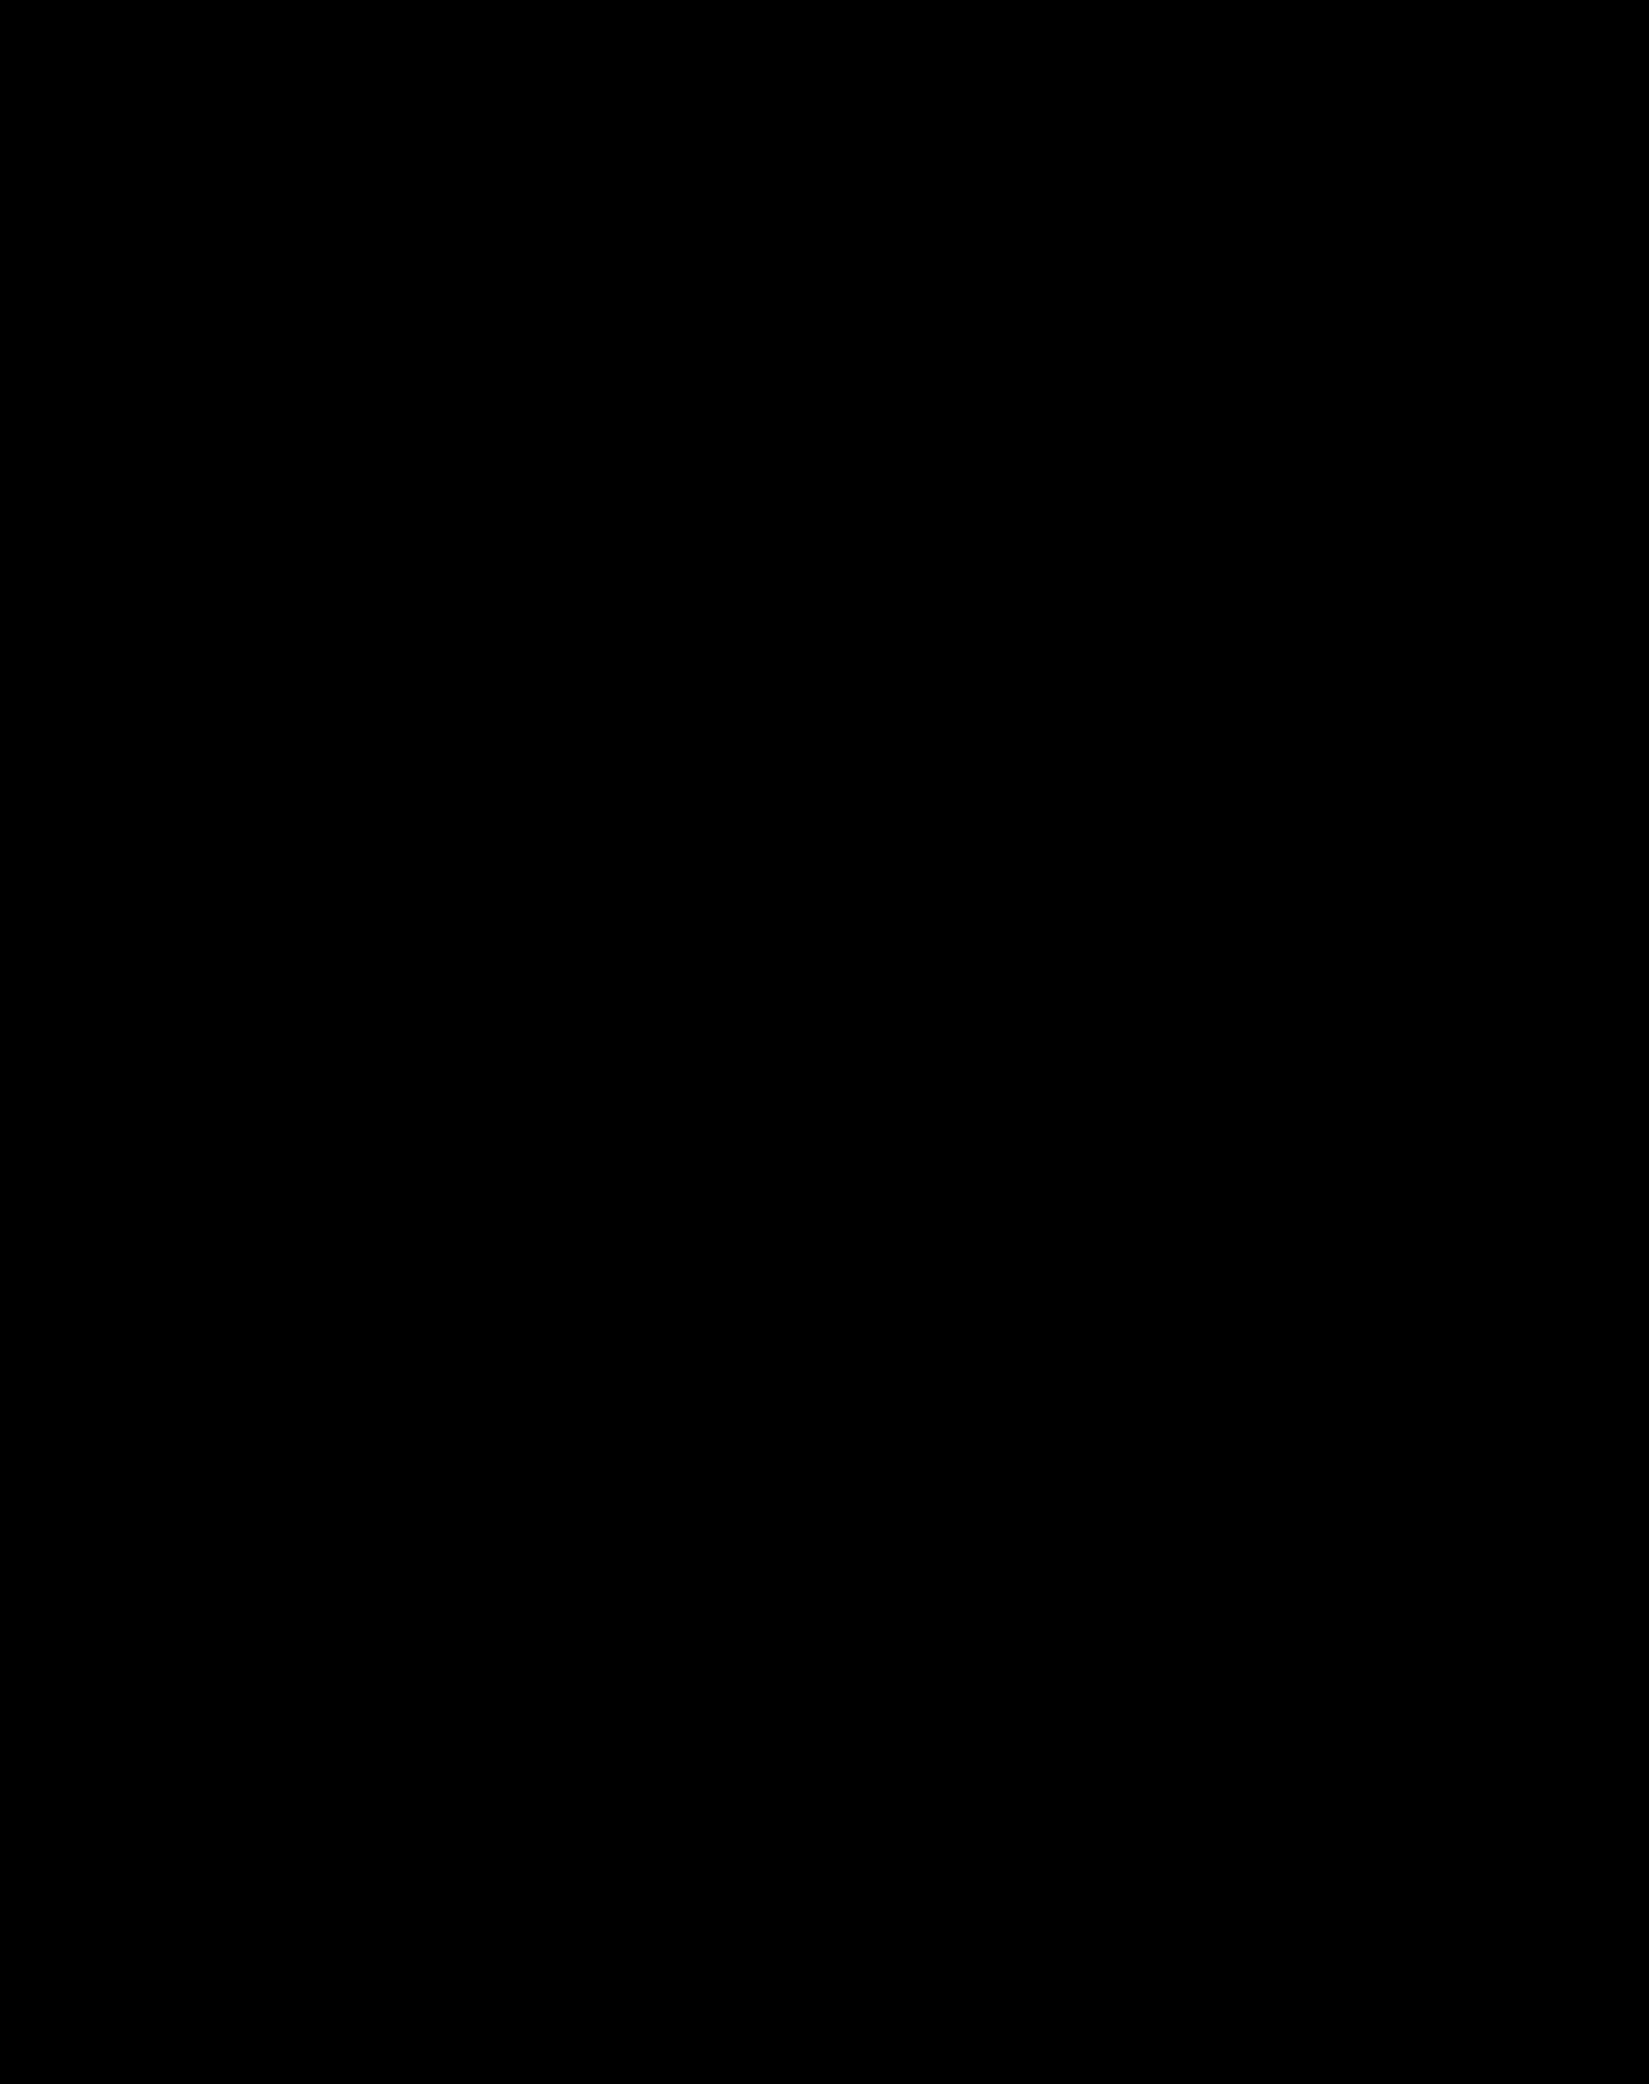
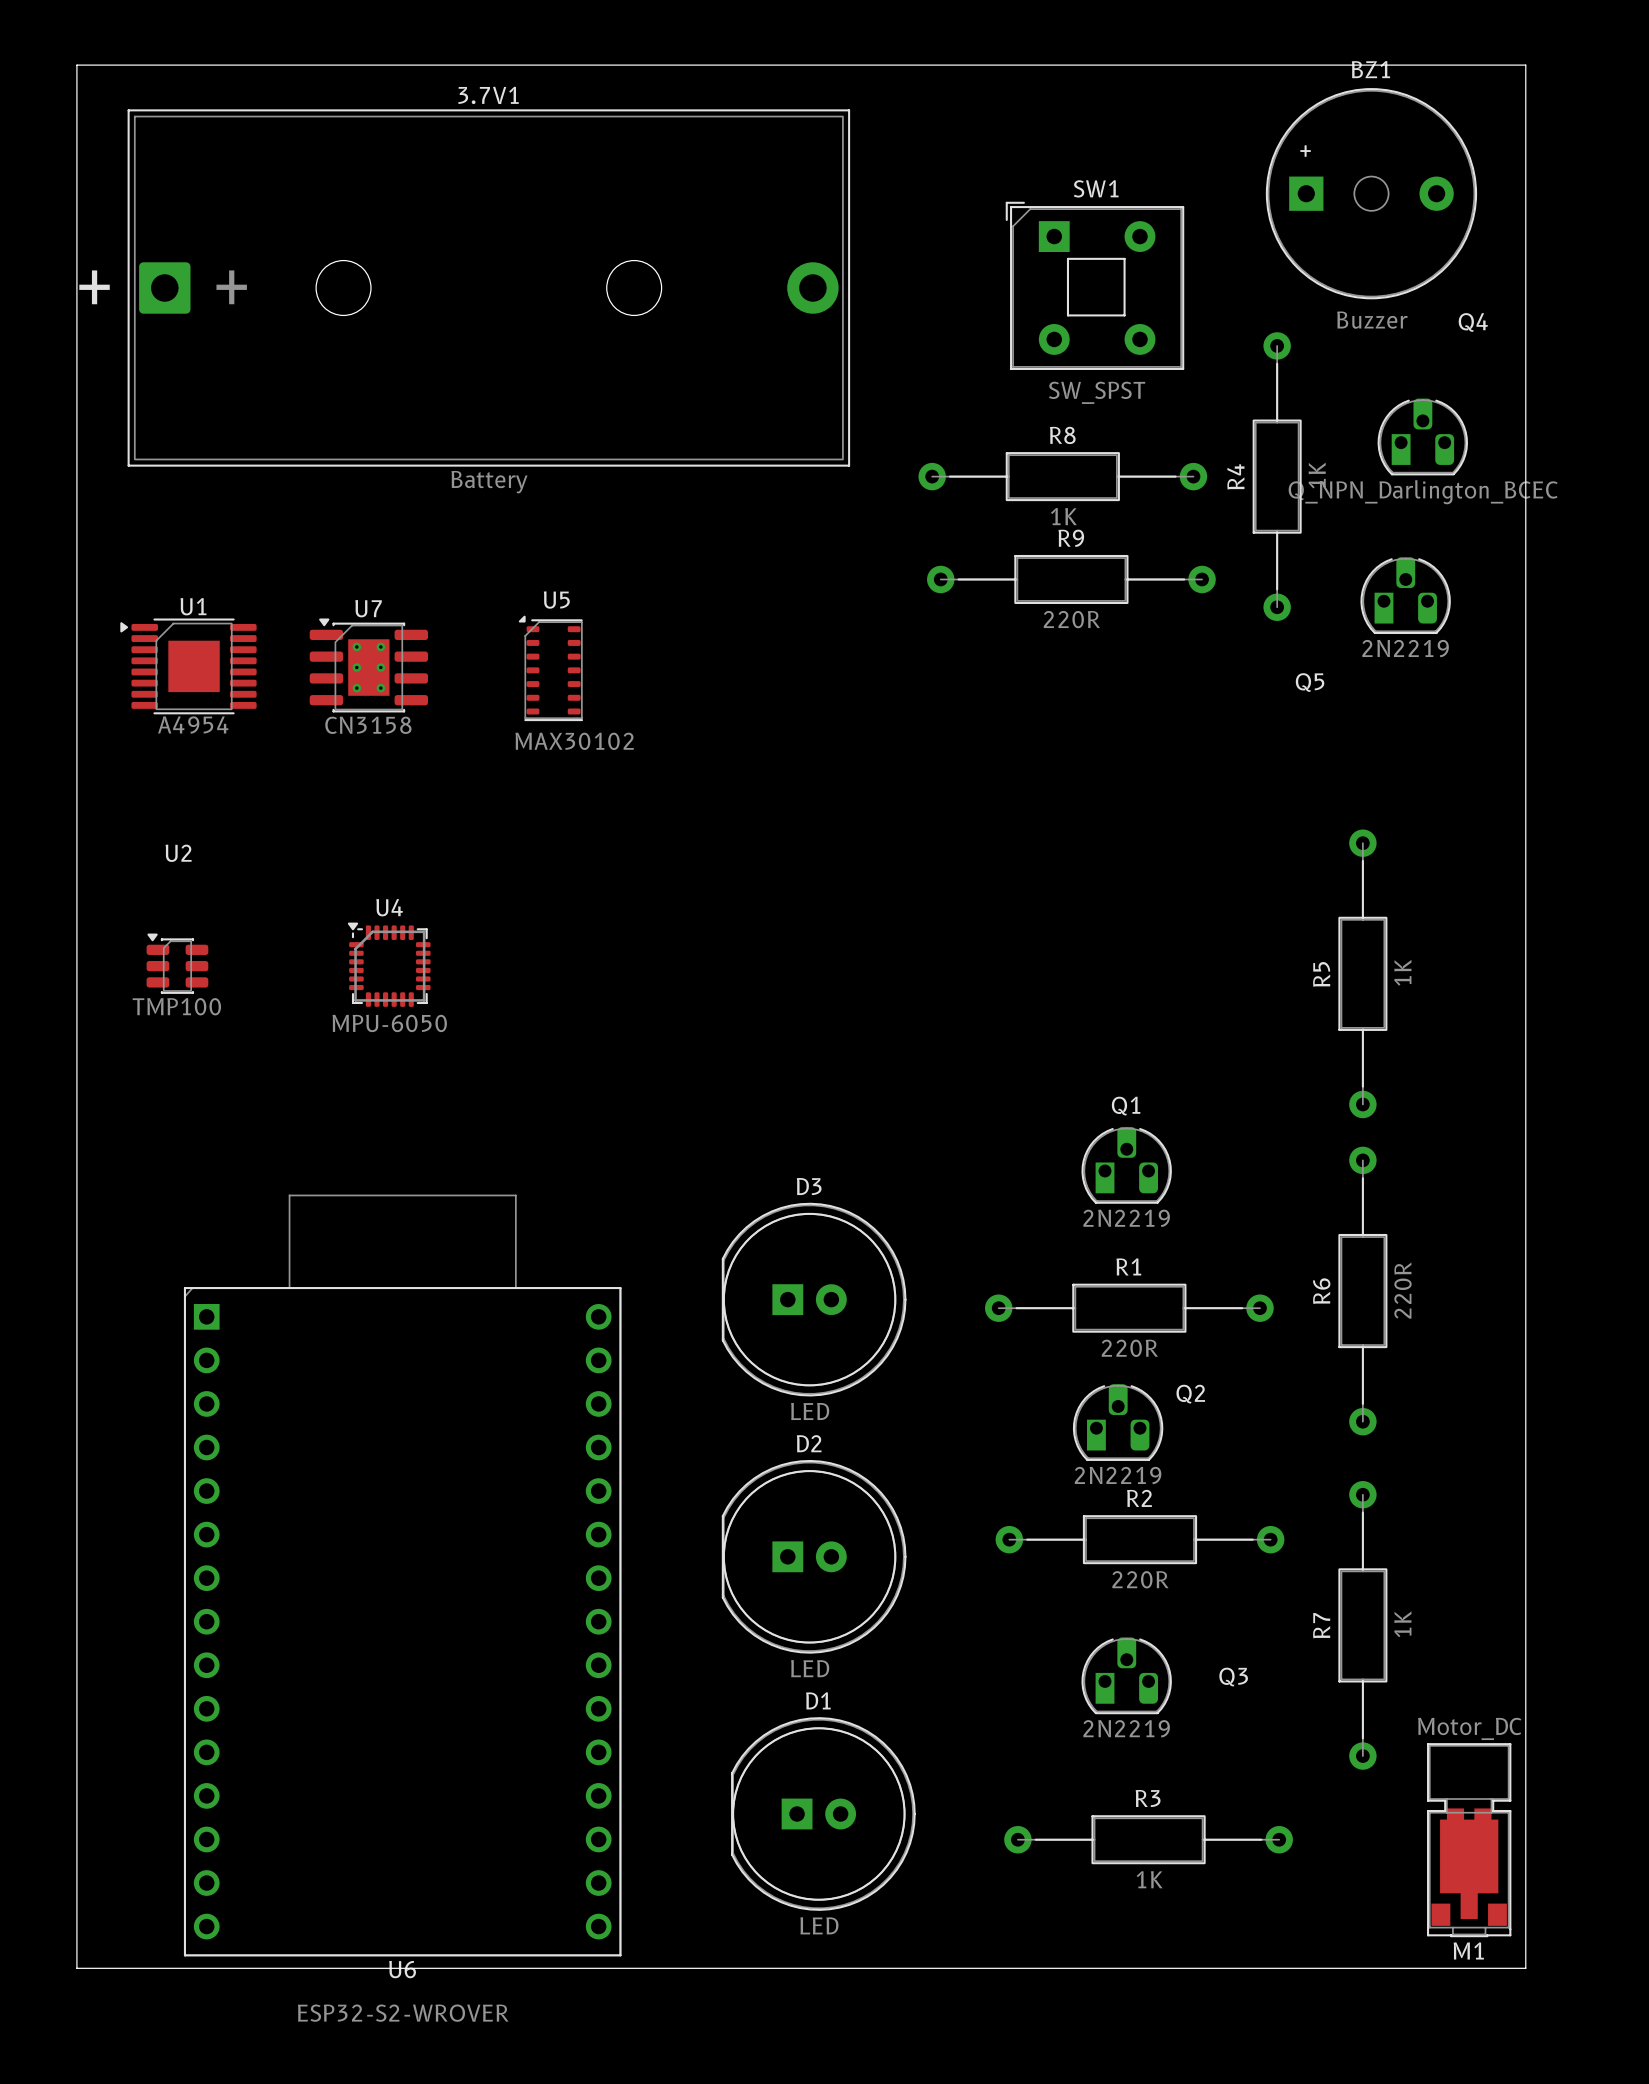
board edge: none -> (76, 65) (1525, 65) (1525, 1968) (76, 1968) (76, 65)
BZ1: none -> Buzzer (1371, 193)
SW1: none -> SW_SPST (1094, 285)
3.7V1: none -> Battery (488, 288)
Q4: none -> Q_NPN_Darlington_BCEC (1422, 437)
R8: none -> 1K (1062, 476)
R4: none -> 1K (1277, 476)
R9: none -> 220R (1071, 579)
Q5: none -> 2N2219 (1405, 595)
U7: none -> CN3158 (368, 665)
U1: none -> A4954 (188, 666)
U5: none -> MAX30102 (550, 668)
U2: none -> TMP100 (177, 963)
U4: none -> MPU-6050 (389, 964)
R5: none -> 1K (1362, 973)
Q1: none -> 2N2219 (1126, 1165)
R6: none -> 220R (1362, 1291)
D3: none -> LED (814, 1299)
R1: none -> 220R (1129, 1308)
Q2: none -> 2N2219 (1118, 1422)
R2: none -> 220R (1139, 1539)
D2: none -> LED (814, 1556)
U6: none -> ESP32-S2-WROVER (402, 1575)
R7: none -> 1K (1362, 1625)
Q3: none -> 2N2219 (1126, 1675)
D1: none -> LED (823, 1814)
R3: none -> 1K (1148, 1839)
M1: none -> Motor_DC (1469, 1840)

